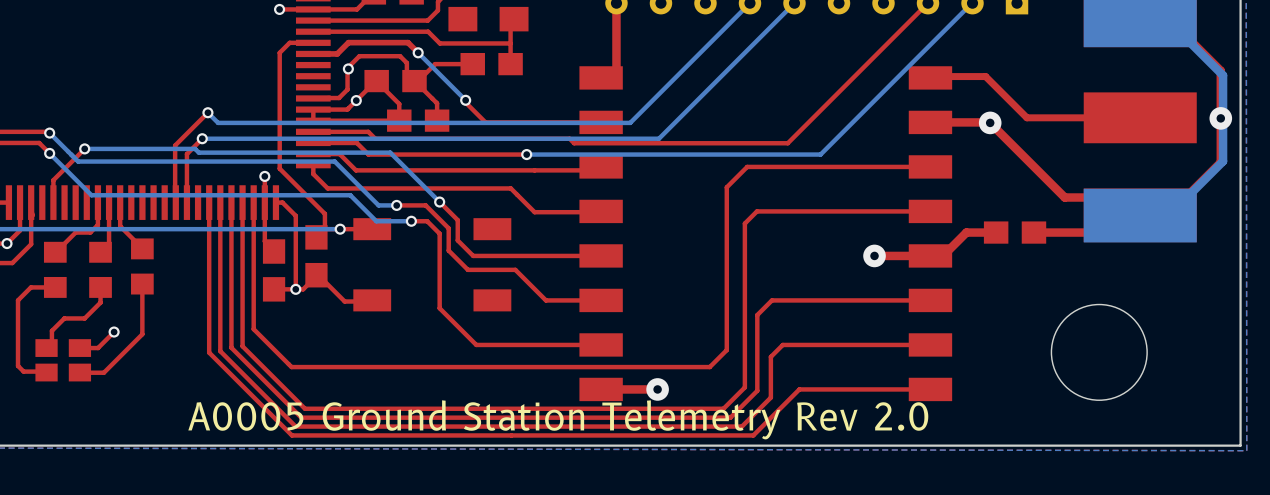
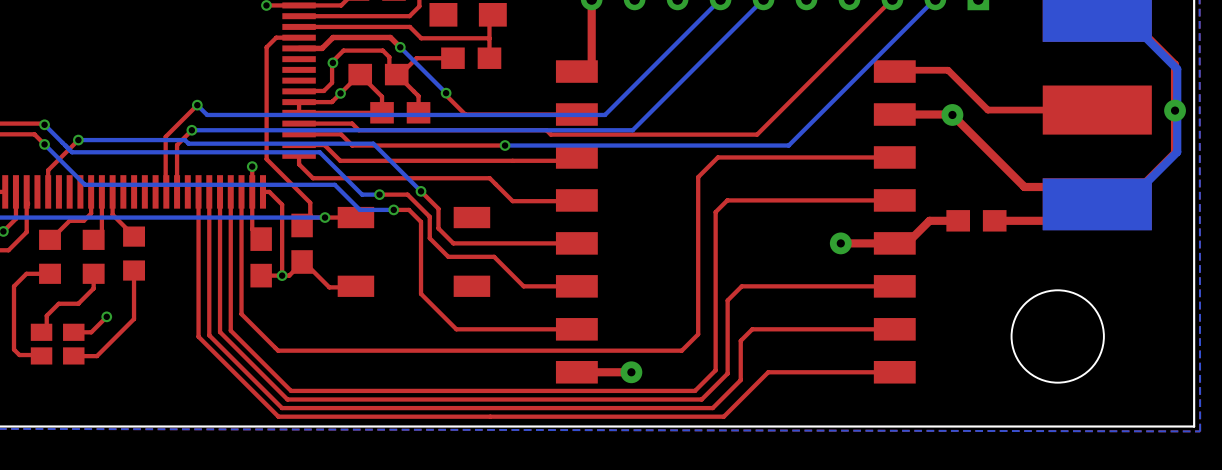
text: A0005 Ground Station Telemetry Rev 2.0 (558, 419) -> none

